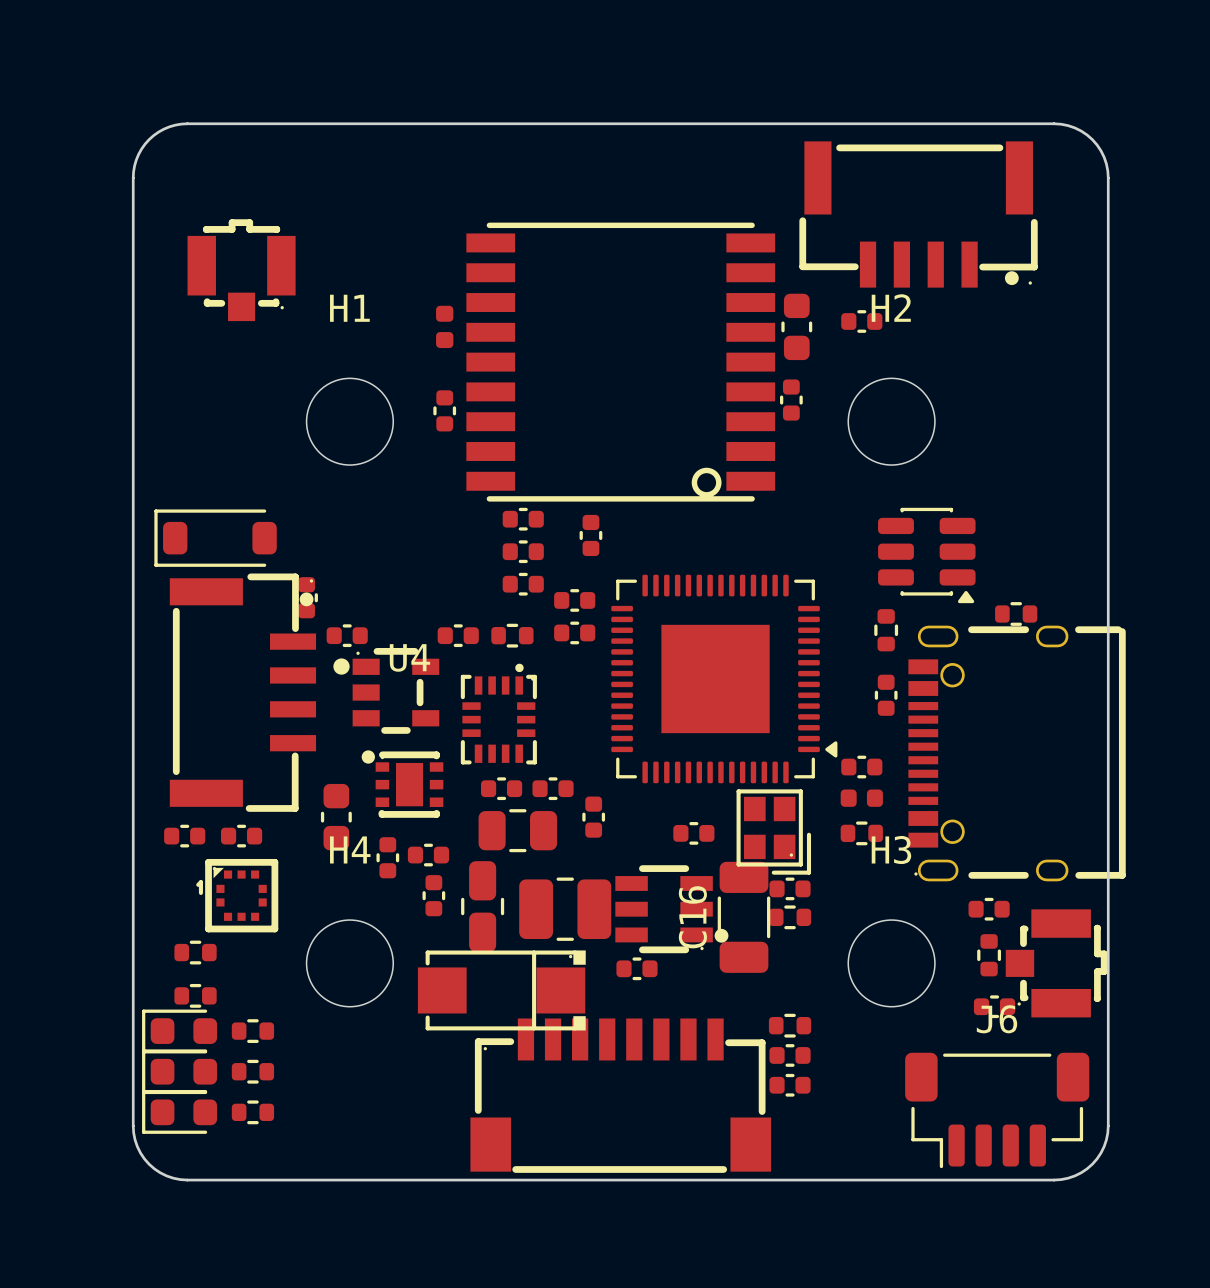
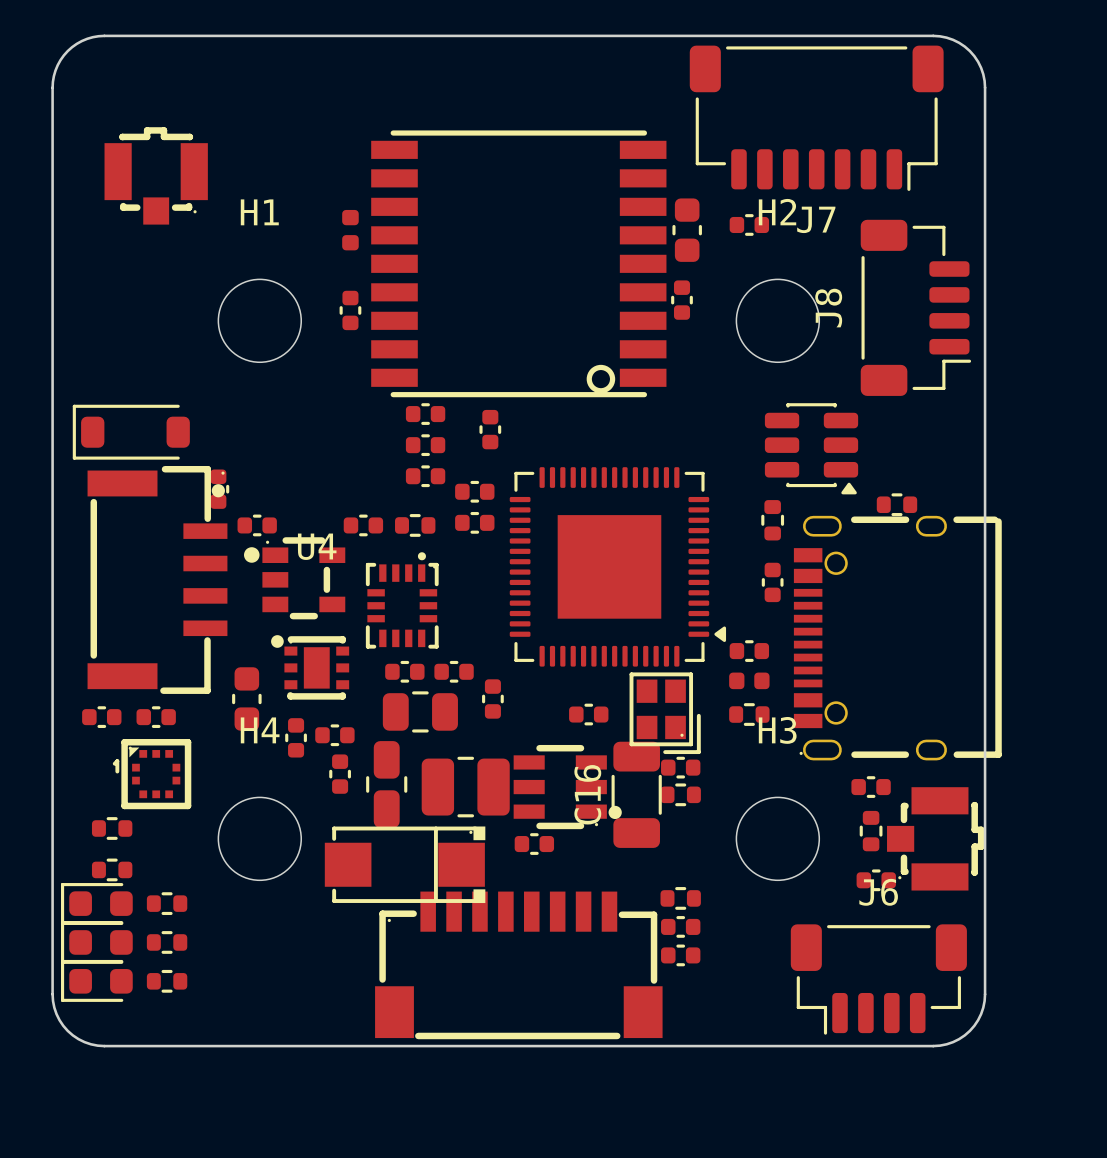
J7: none -> (816, 118)
part: (918, 214) -> none
J8: none -> (915, 307)

